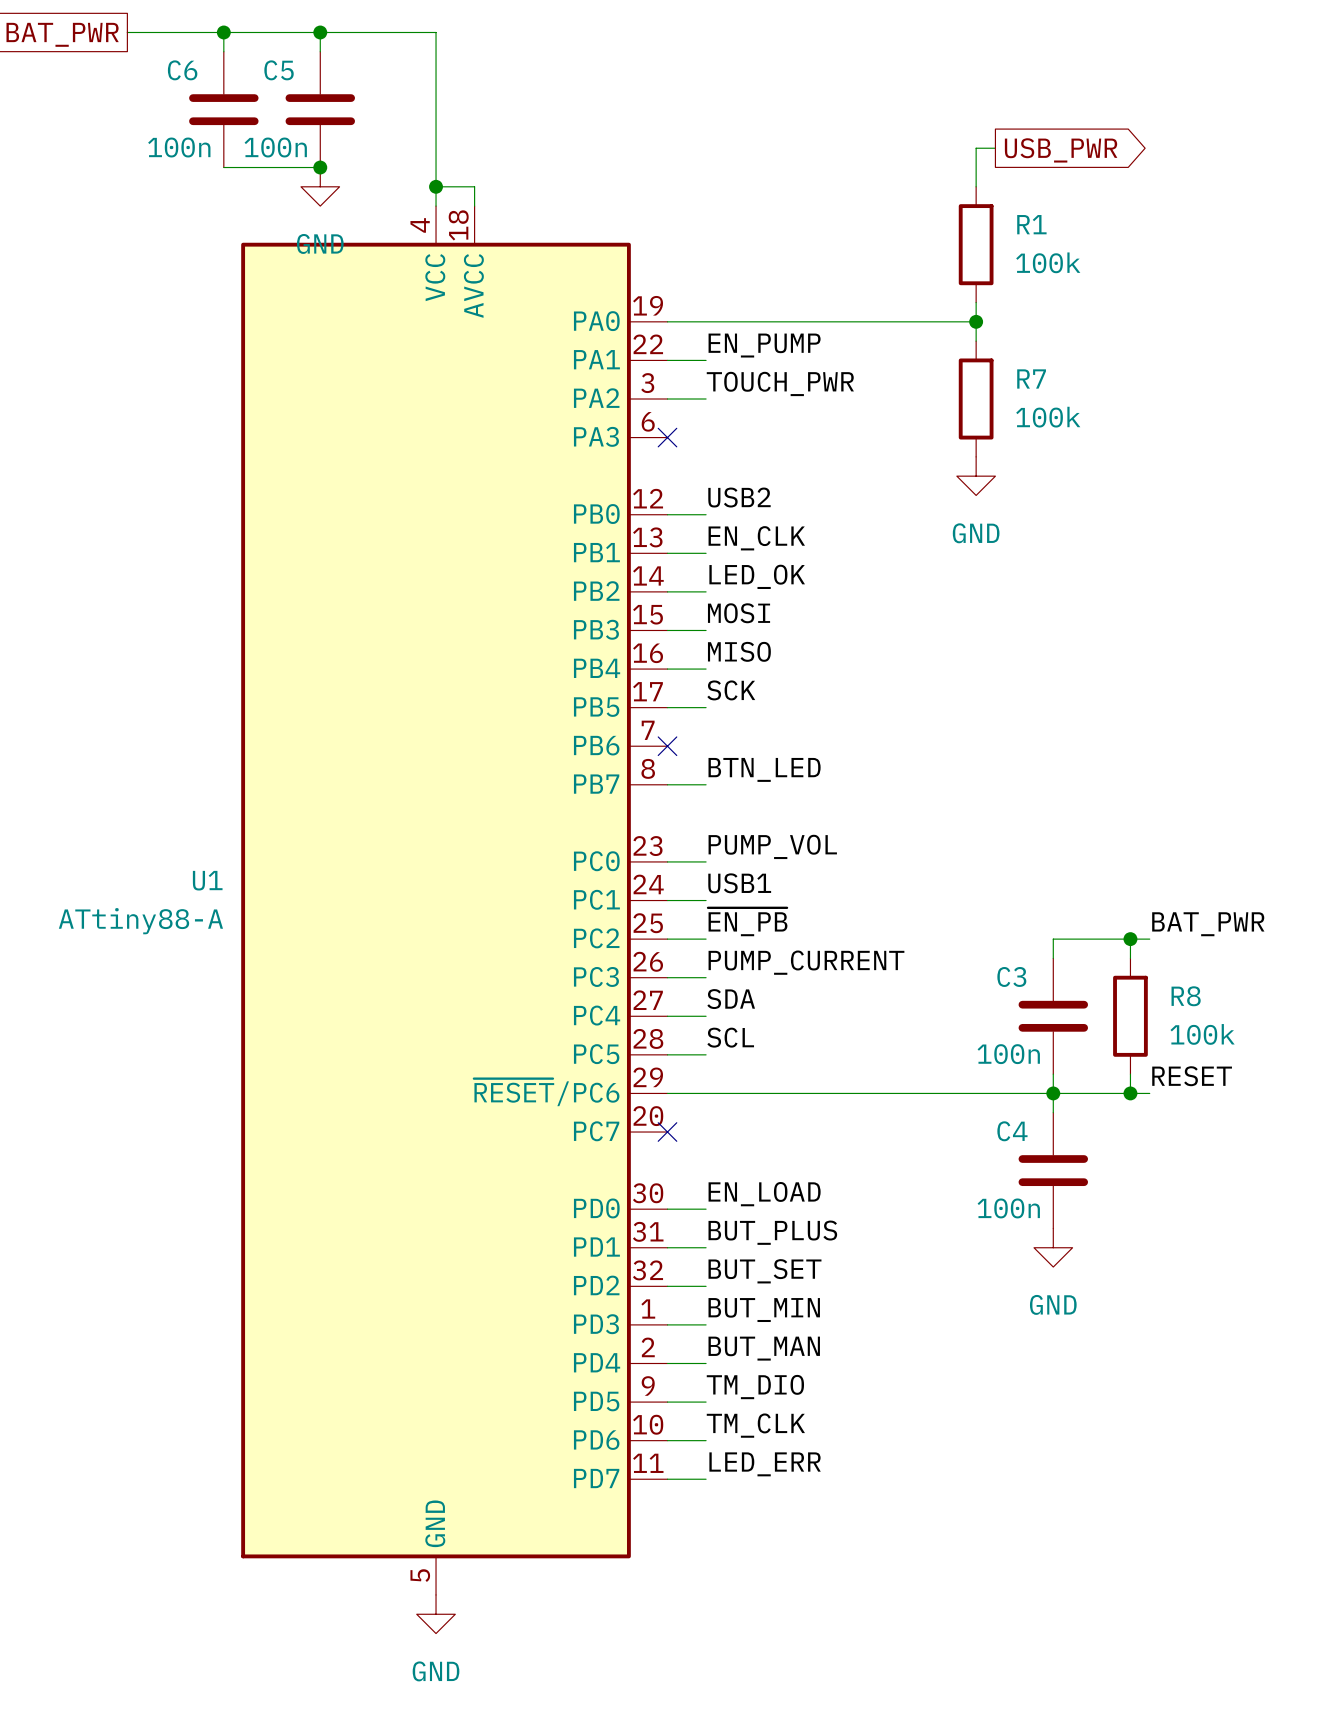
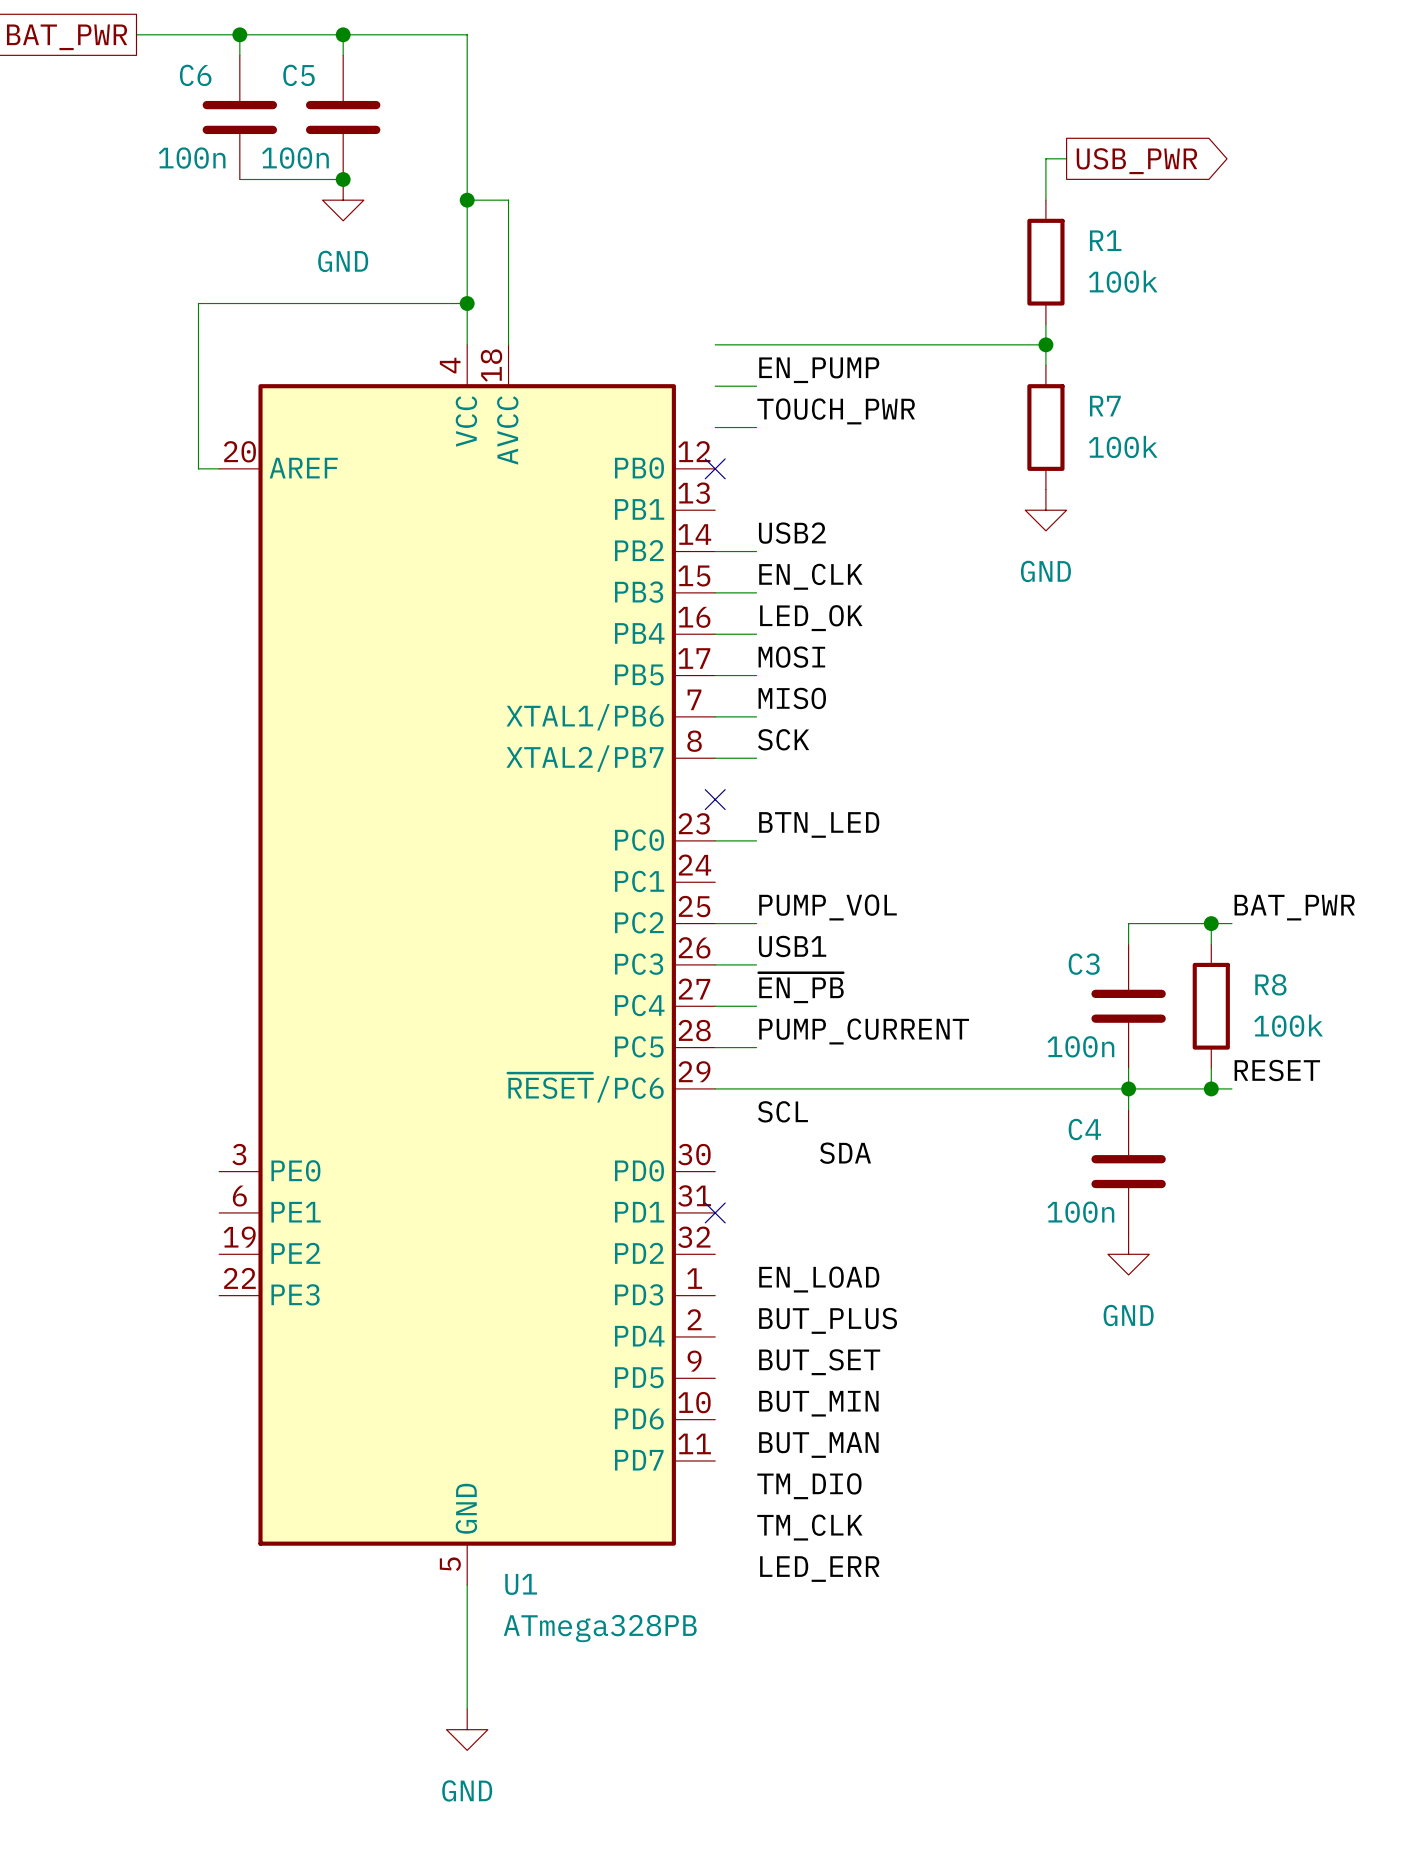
U1 symbol: [241, 206, 668, 1595] -> [219, 344, 716, 1586]
wire: none -> (467, 303) (198, 303) (198, 468) (219, 468)
junction: none -> (467, 303)
junction: none -> (1211, 923)
U1 name position: U1 (207, 880) -> U1 (521, 1584)
U1 value: ATtiny88-A (140, 921) -> ATmega328PB (600, 1628)
label position: BAT_PWR (1208, 924) -> BAT_PWR (1294, 907)
wire: (1130, 939) (1130, 958) -> (1211, 923) (1211, 944)
junction: (1130, 939) -> none
wire: (1149, 939) (1053, 939) (1053, 958) -> (1231, 923) (1128, 923) (1128, 944)
label position: SDA (731, 999) -> SDA (845, 1153)
wire: none -> (756, 1088) (1231, 1088)
junction: none -> (1128, 1088)
C3 position: (1053, 1016) -> (1128, 1006)
junction: none -> (1211, 1088)
R8 position: (1130, 1016) -> (1211, 1006)
wire: (667, 1054) (706, 1054) -> none
wire: (1130, 1074) (1130, 1093) -> (1211, 1068) (1211, 1088)
label position: RESET (1192, 1076) -> RESET (1277, 1070)
wire: (667, 1093) (1149, 1093) -> none
junction: (1053, 1093) -> none
junction: (1130, 1093) -> none
C4 position: (1053, 1170) -> (1128, 1171)
wire: (667, 1209) (706, 1209) -> none
wire: (667, 1247) (706, 1247) -> none
power symbol position: GND (1053, 1247) -> GND (1128, 1254)
wire: (667, 1286) (706, 1286) -> none
wire: (667, 1324) (706, 1324) -> none
wire: (667, 1363) (706, 1363) -> none
wire: (667, 1402) (706, 1402) -> none
wire: (667, 1440) (706, 1440) -> none
wire: (667, 1479) (706, 1479) -> none

